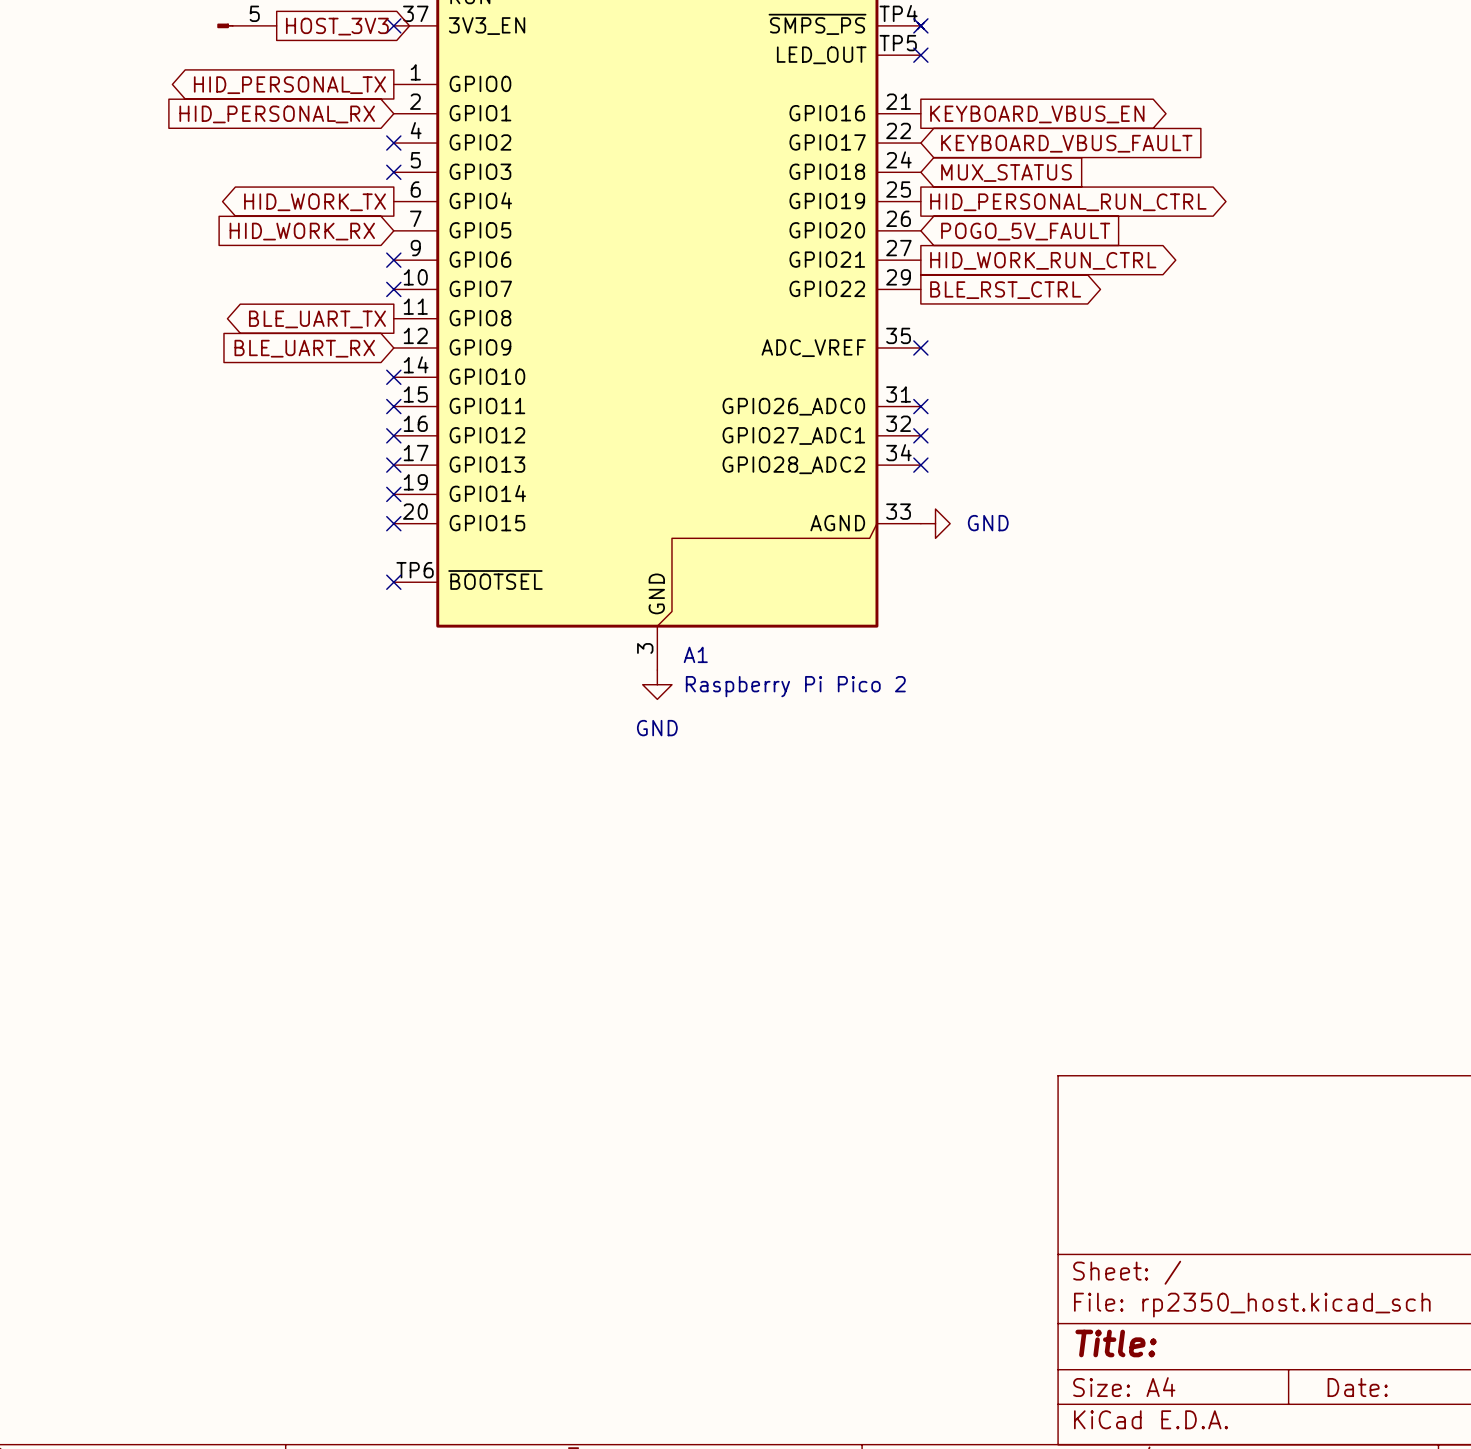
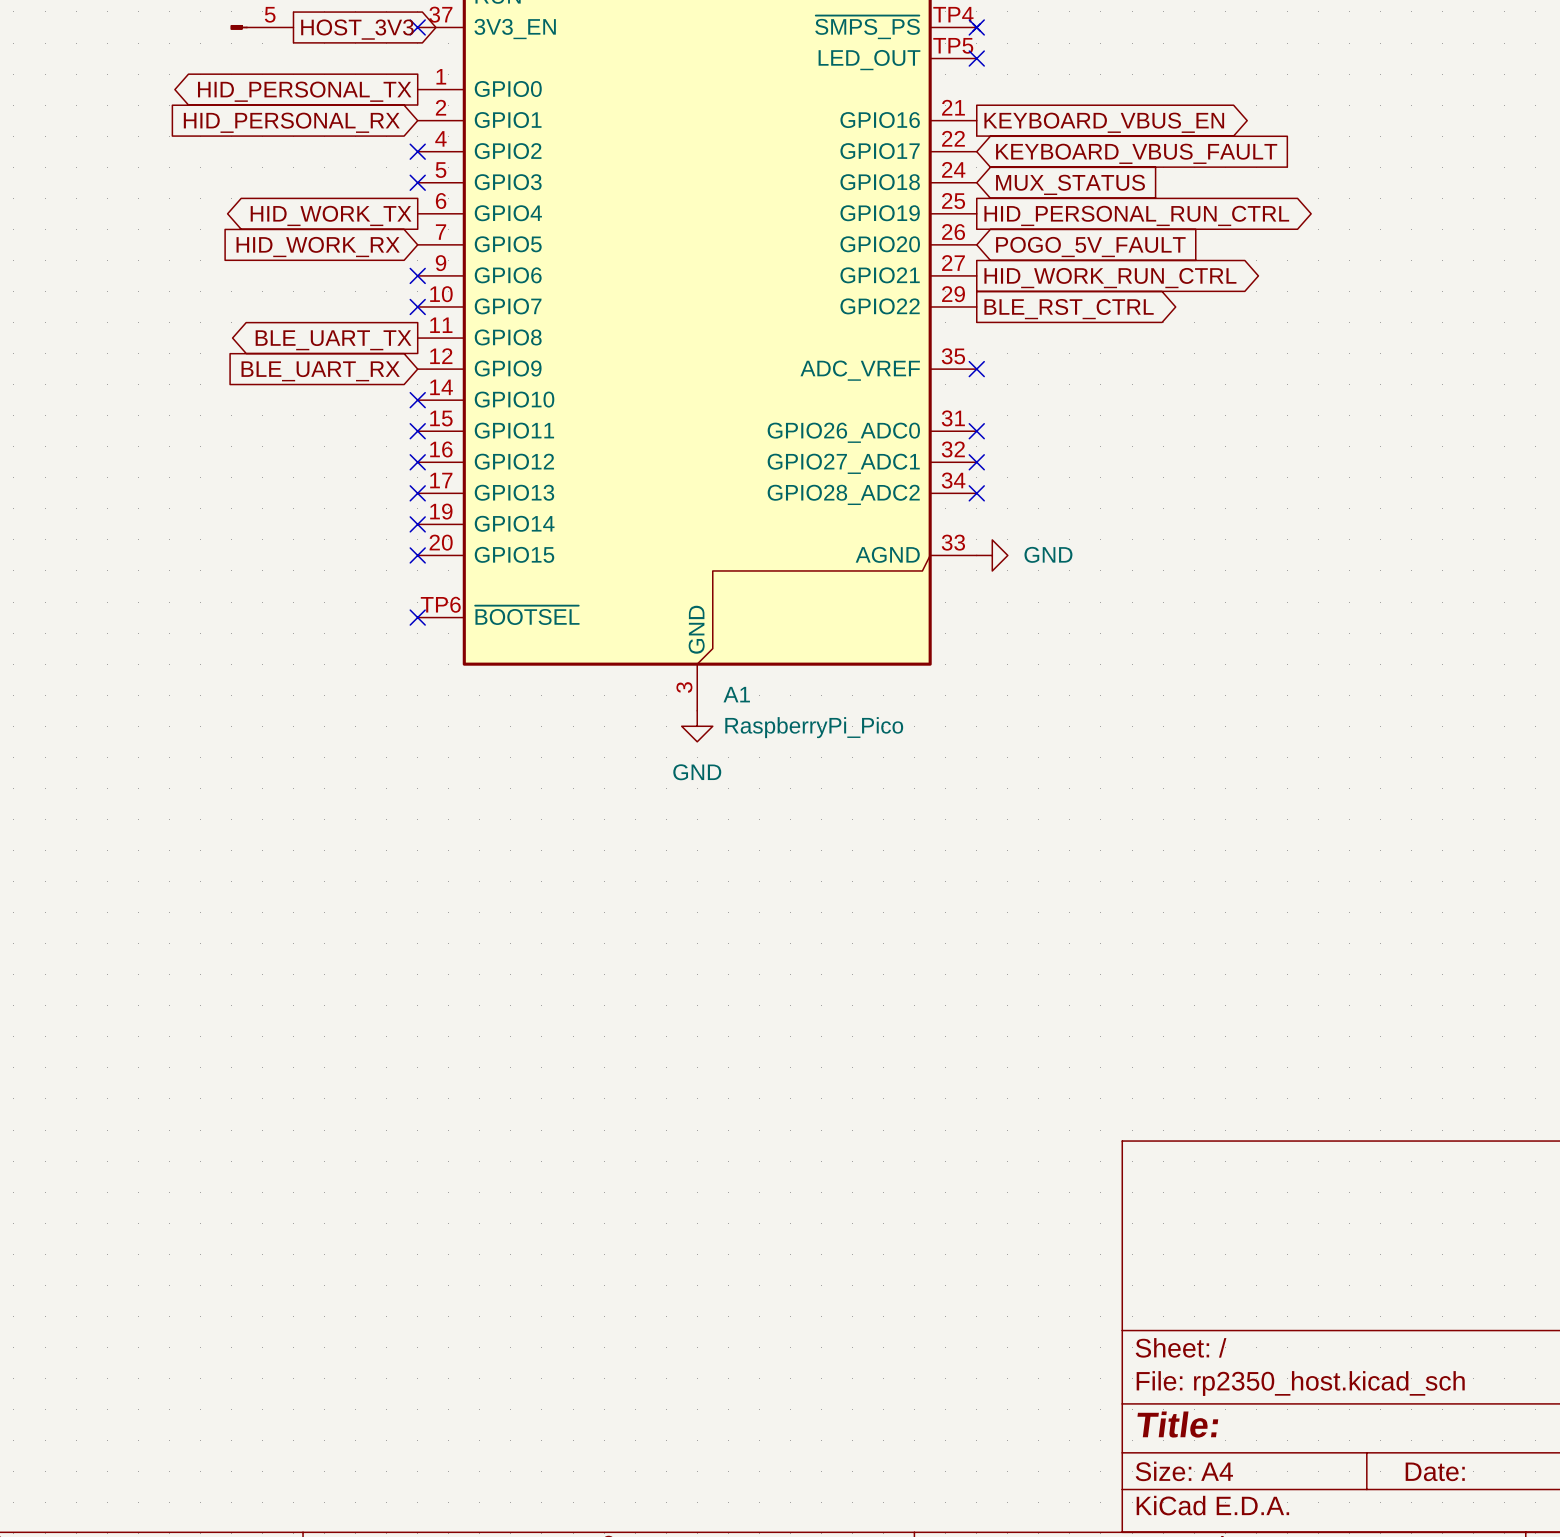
A1 value: Raspberry Pi Pico 2 (795, 686) -> RaspberryPi_Pico (814, 727)

